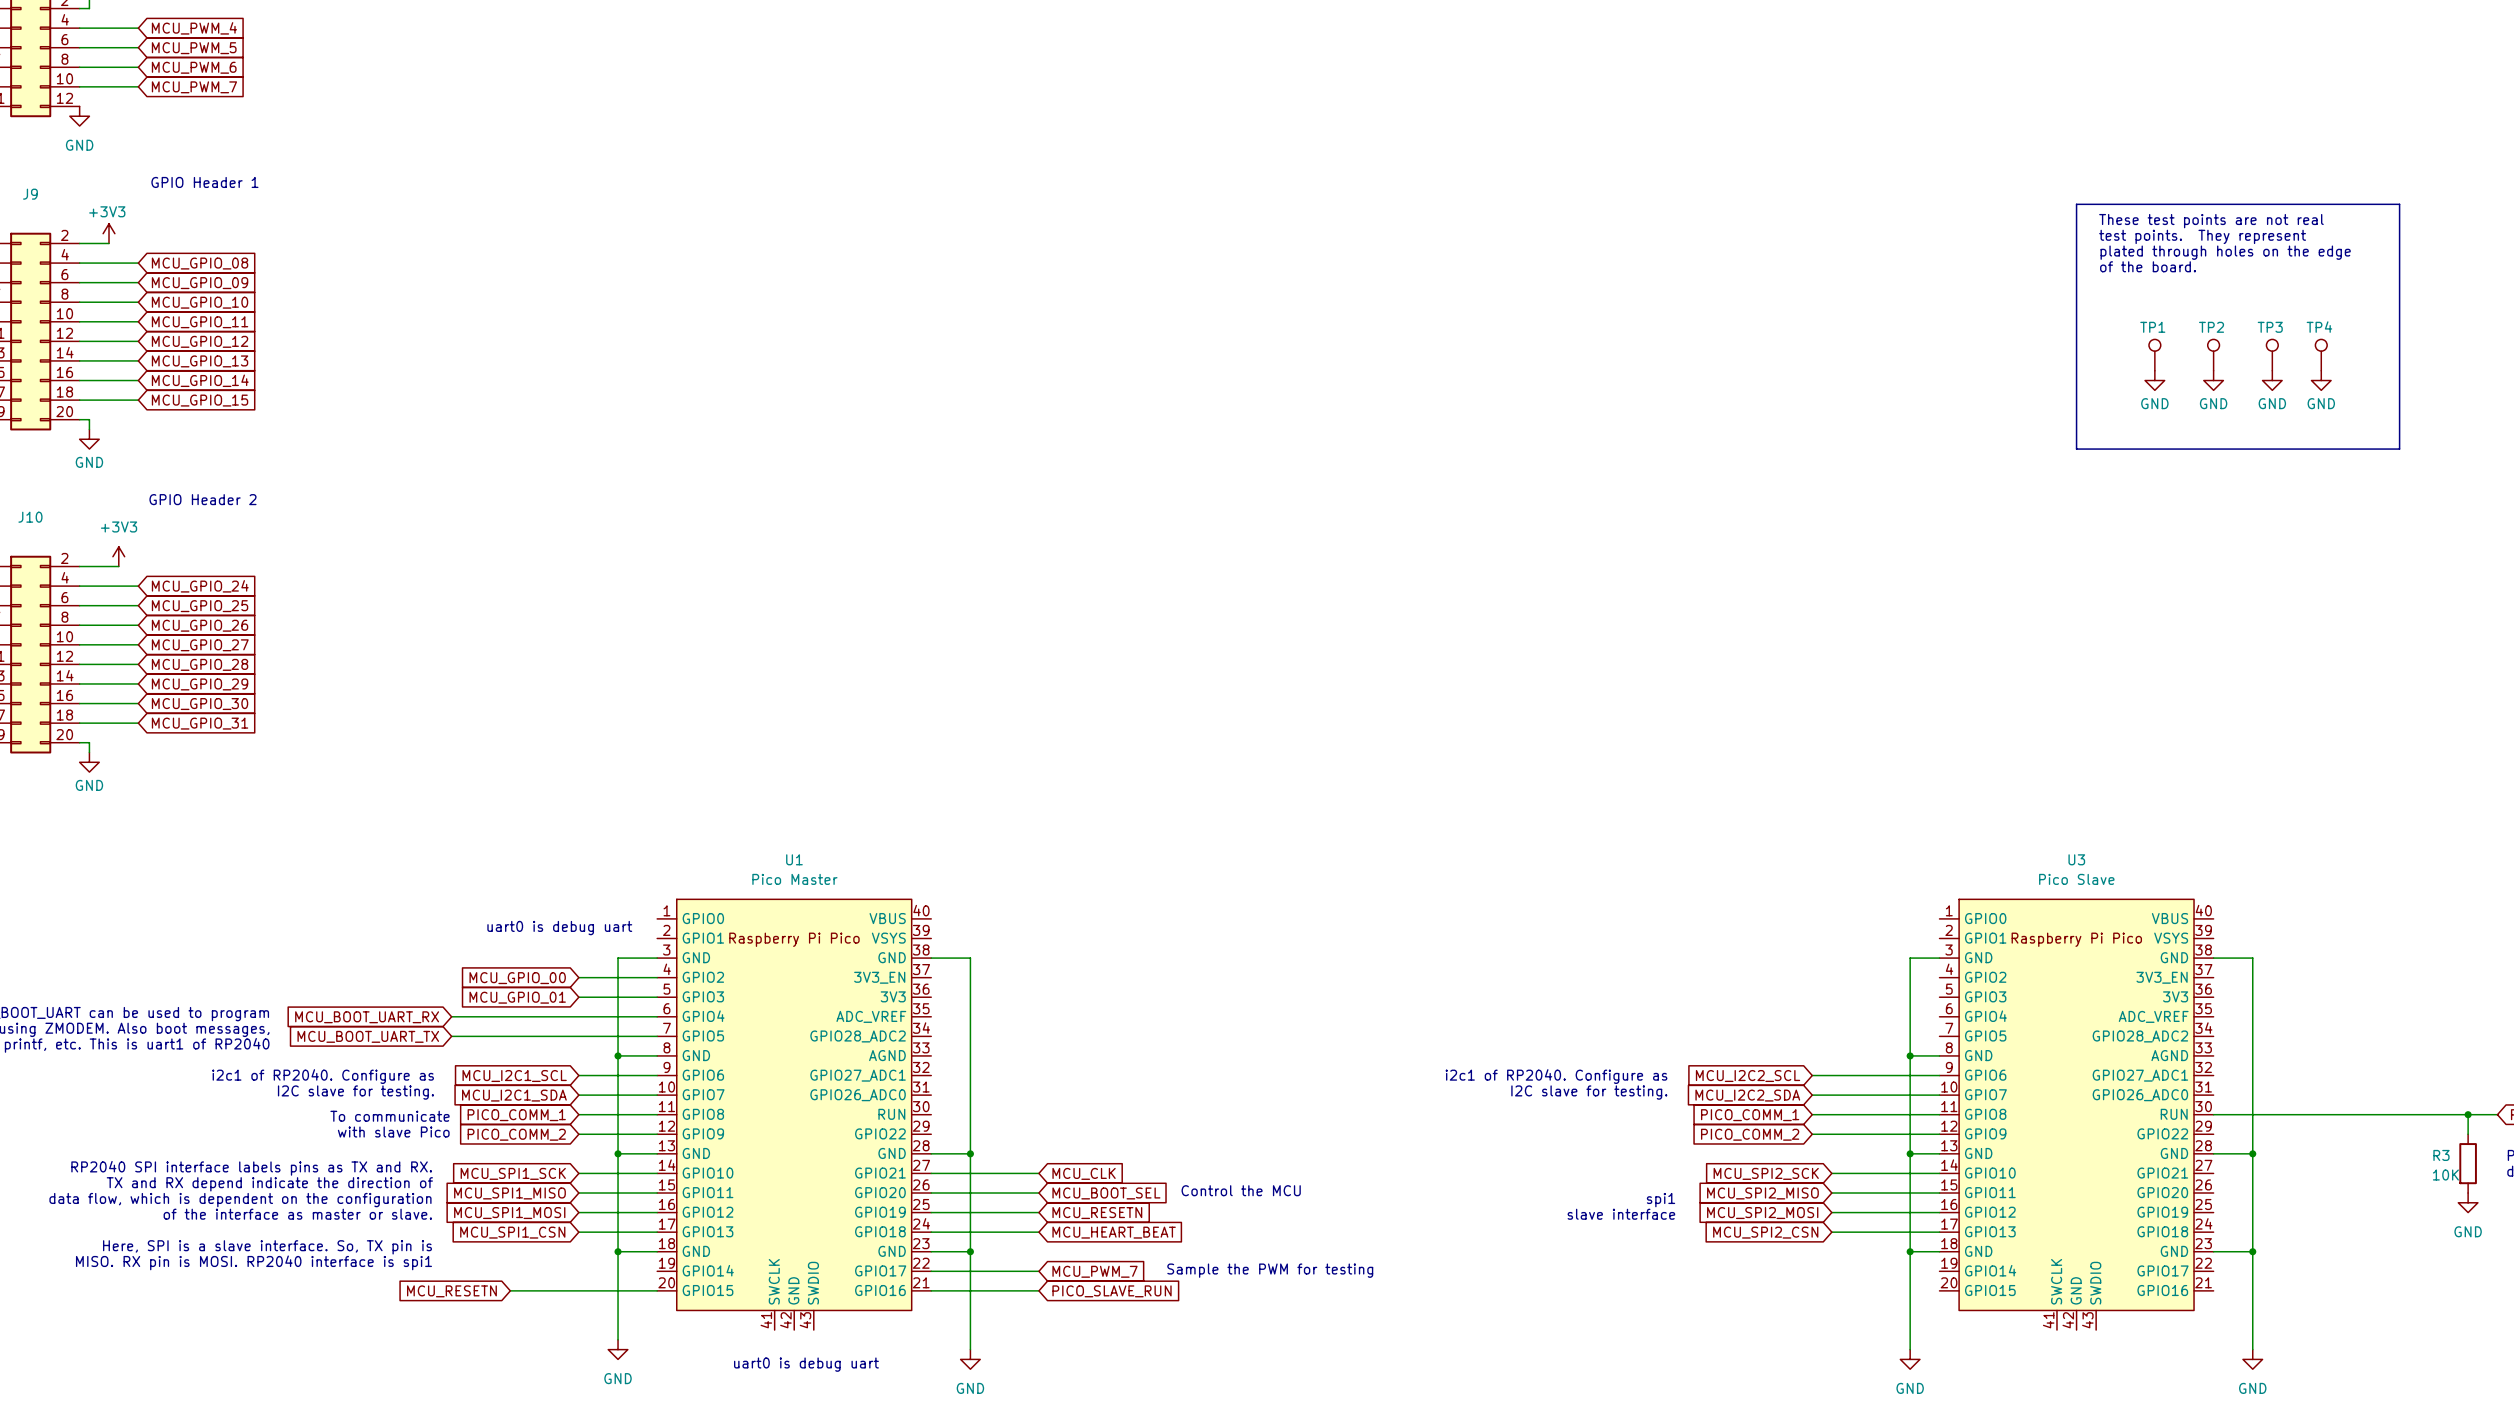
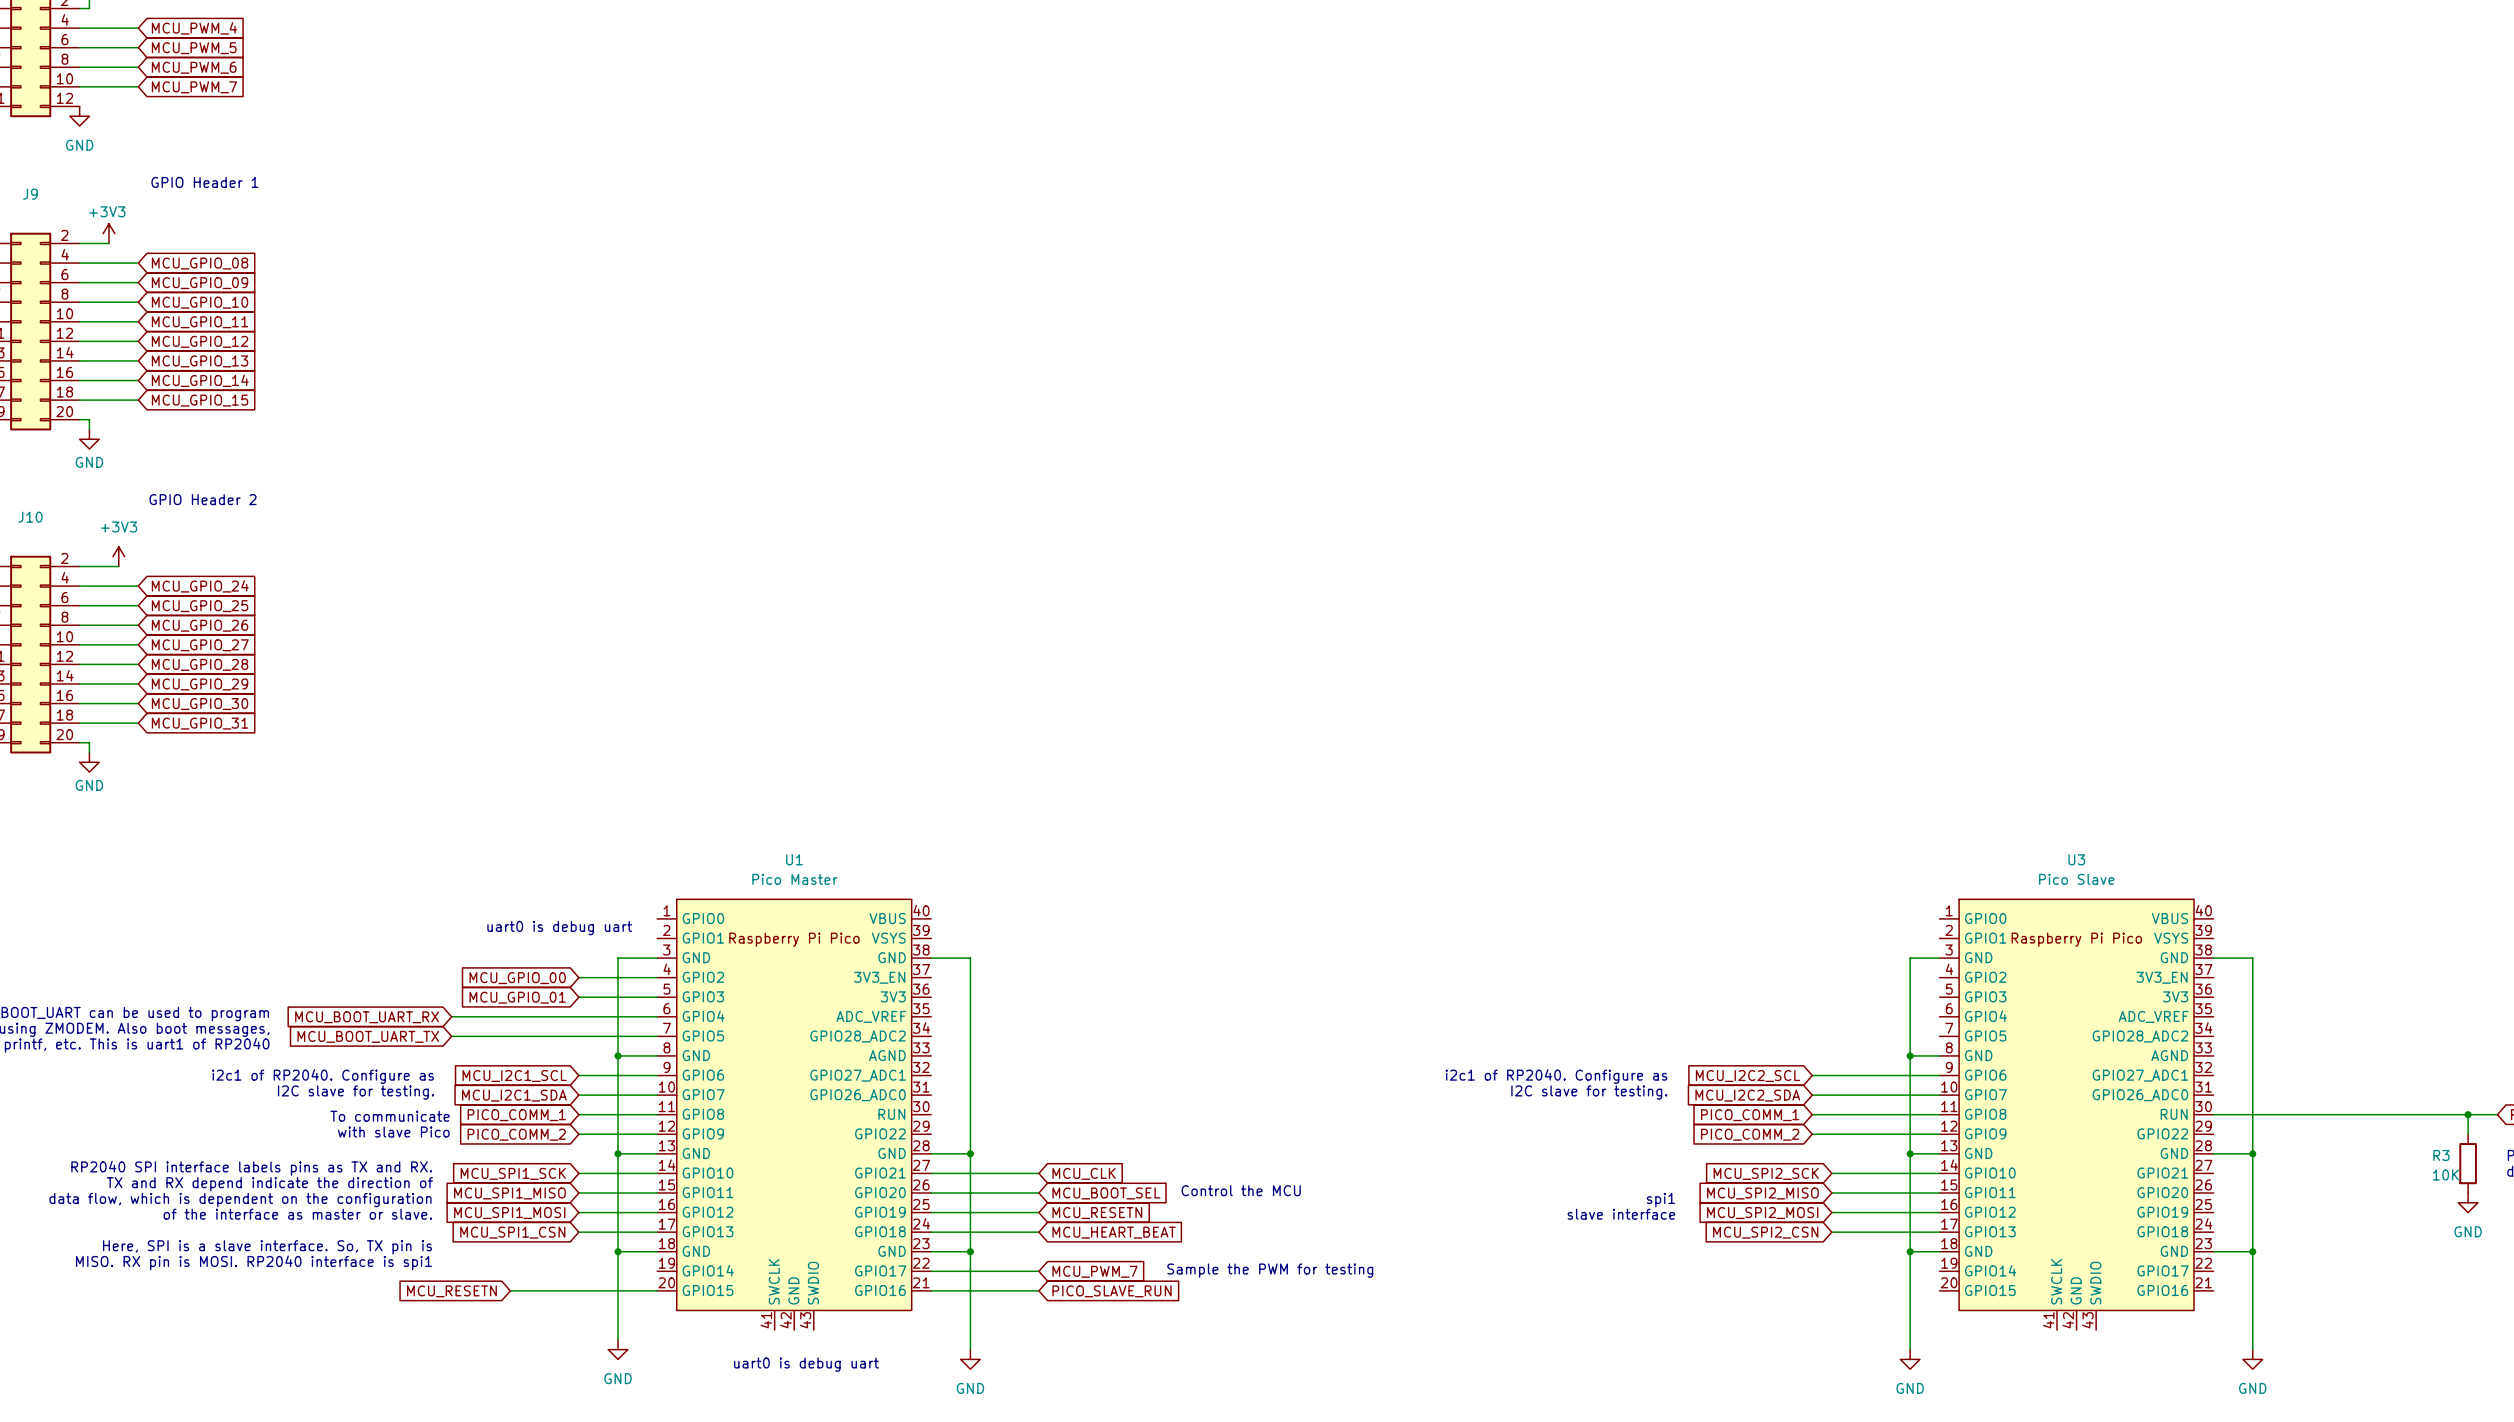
line: (2076, 204) (2399, 204) (2399, 449) (2076, 449) (2076, 204) -> none
text: These test points are not real (2211, 221) -> none
text: test points. They represent (2202, 236) -> none
text: plated through holes on the edge (2225, 252) -> none
text: of the board. (2148, 266) -> none
TP1: (2154, 355) -> none
TP2: (2213, 355) -> none
TP3: (2272, 355) -> none
TP4: (2321, 355) -> none
power symbol: GND (2154, 380) -> none
power symbol: GND (2213, 380) -> none
power symbol: GND (2272, 380) -> none
power symbol: GND (2321, 380) -> none

